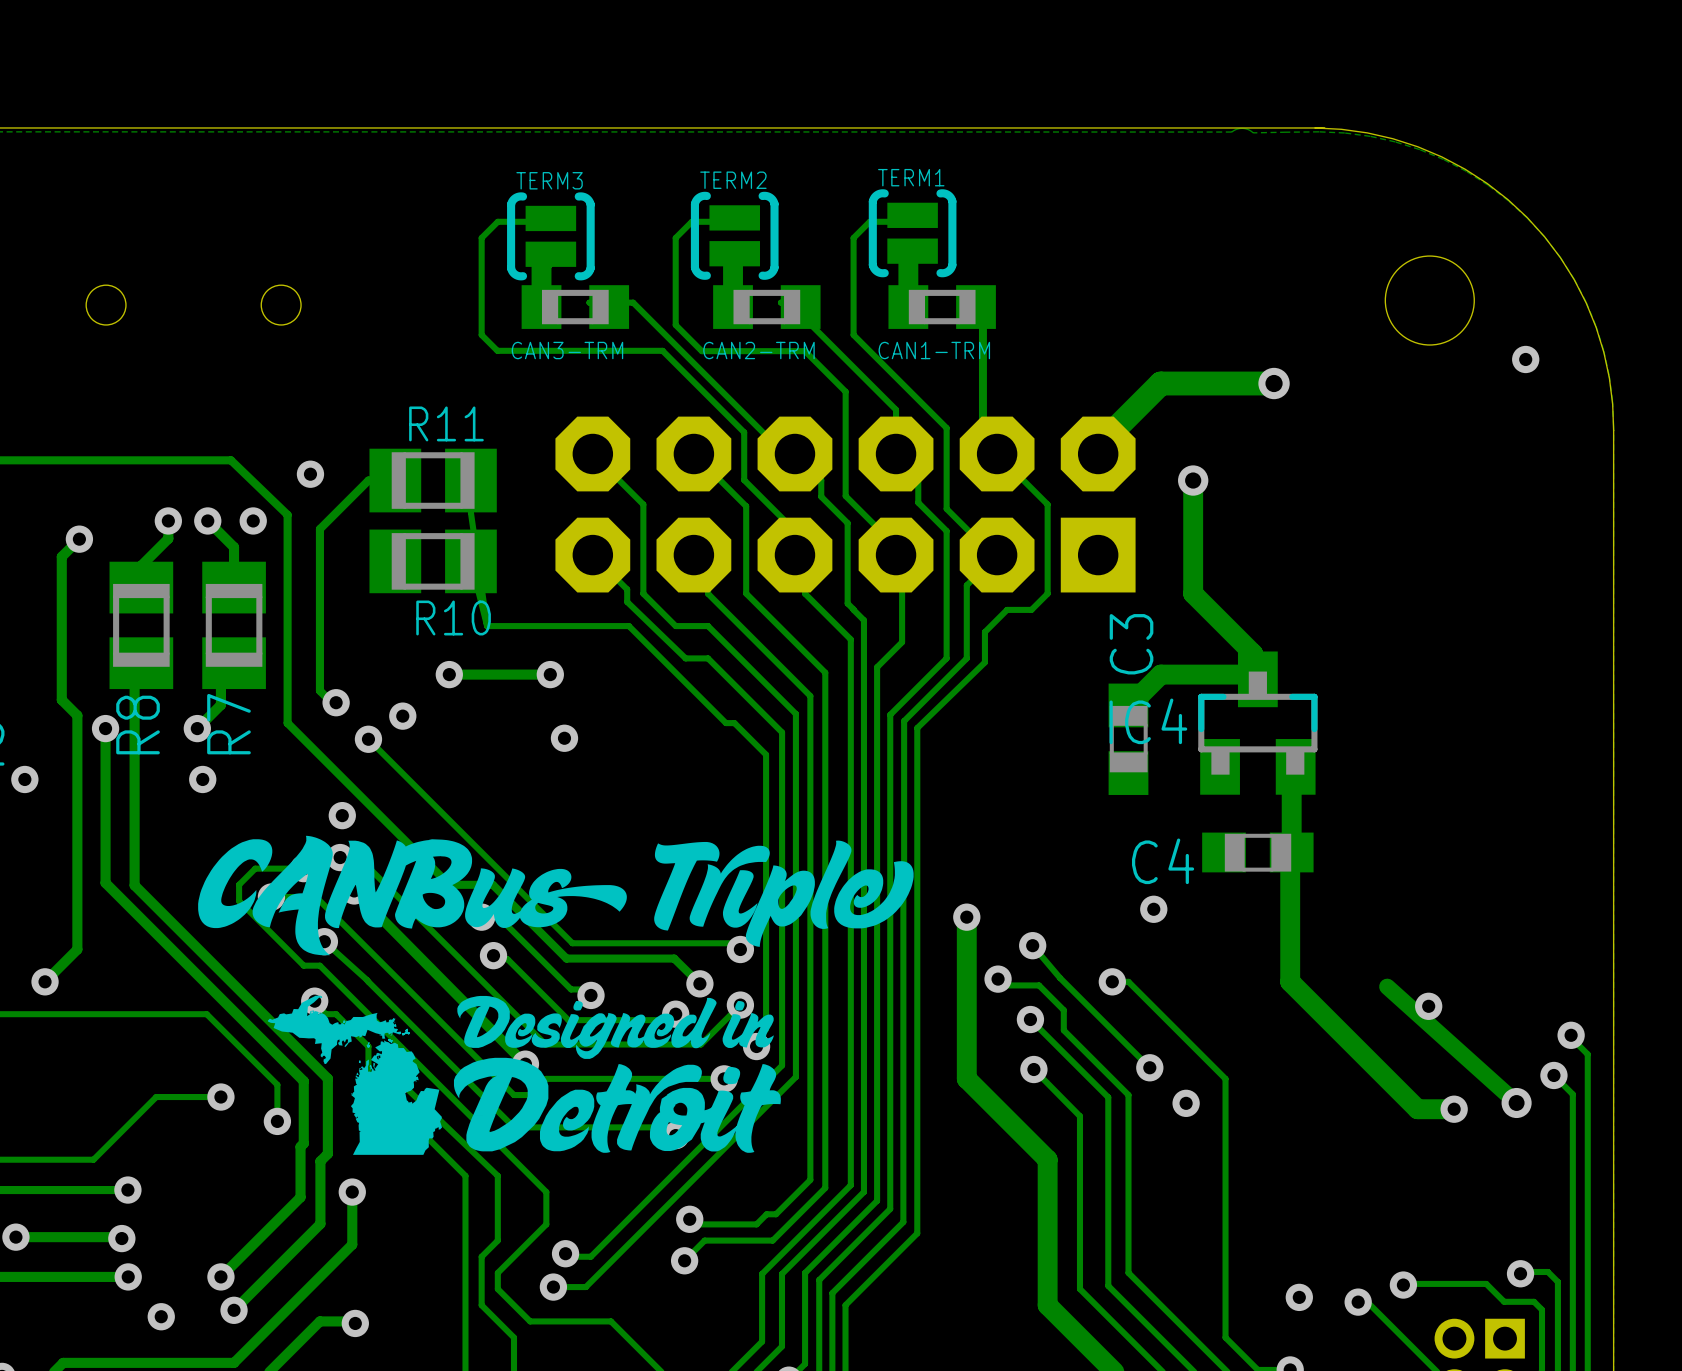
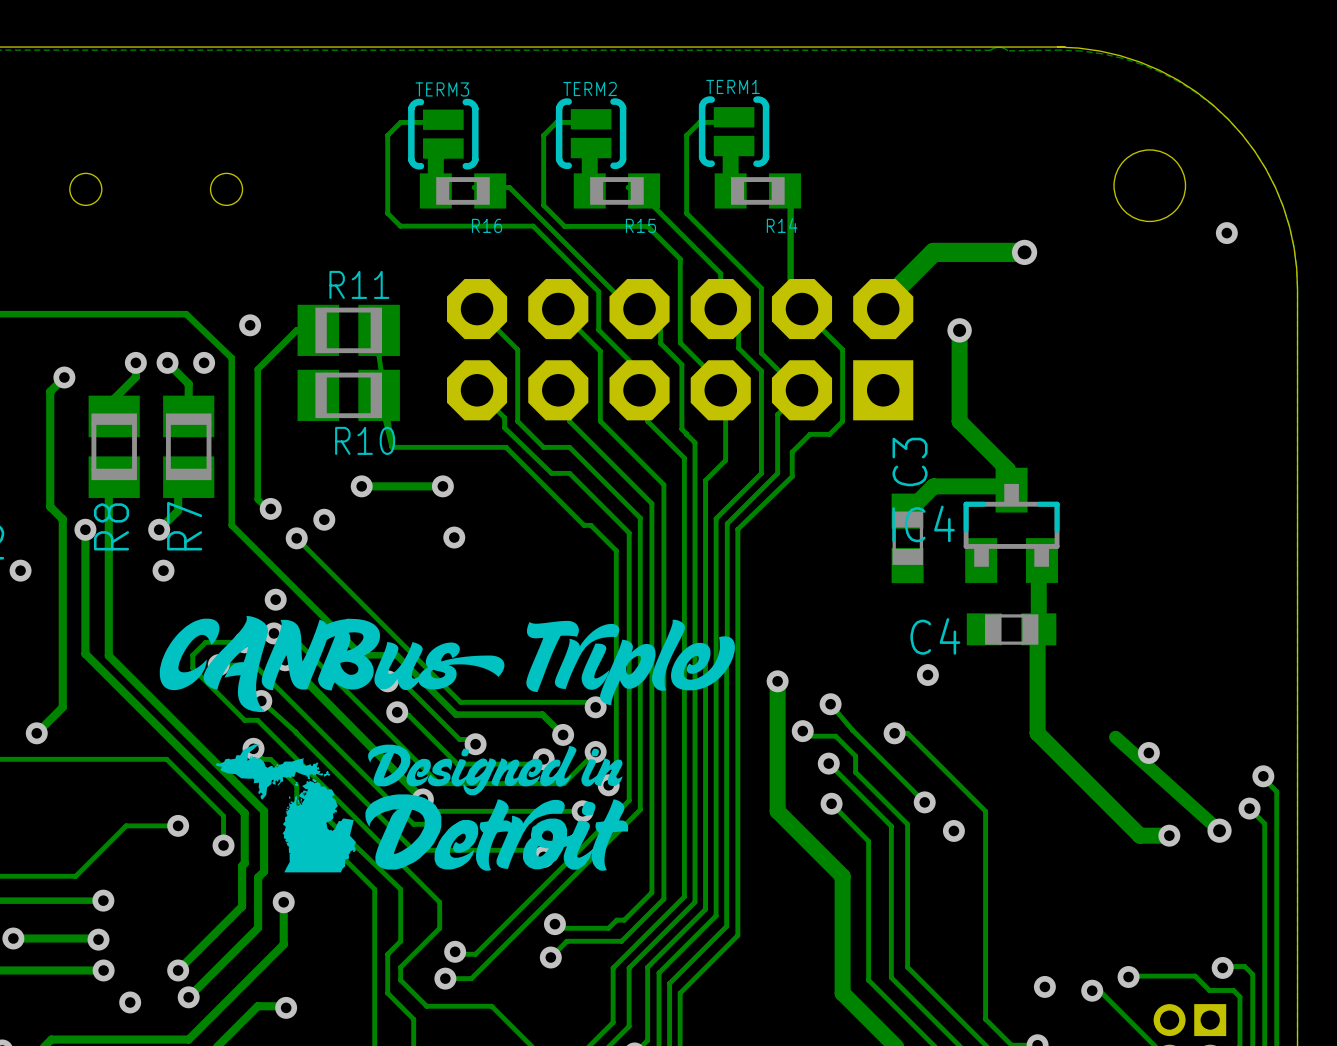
CAN3-TRM name: CAN3-TRM (567, 350) -> R16 (487, 225)
CAN2-TRM name: CAN2-TRM (758, 350) -> R15 (640, 225)
CAN1-TRM name: CAN1-TRM (934, 350) -> R14 (782, 225)

